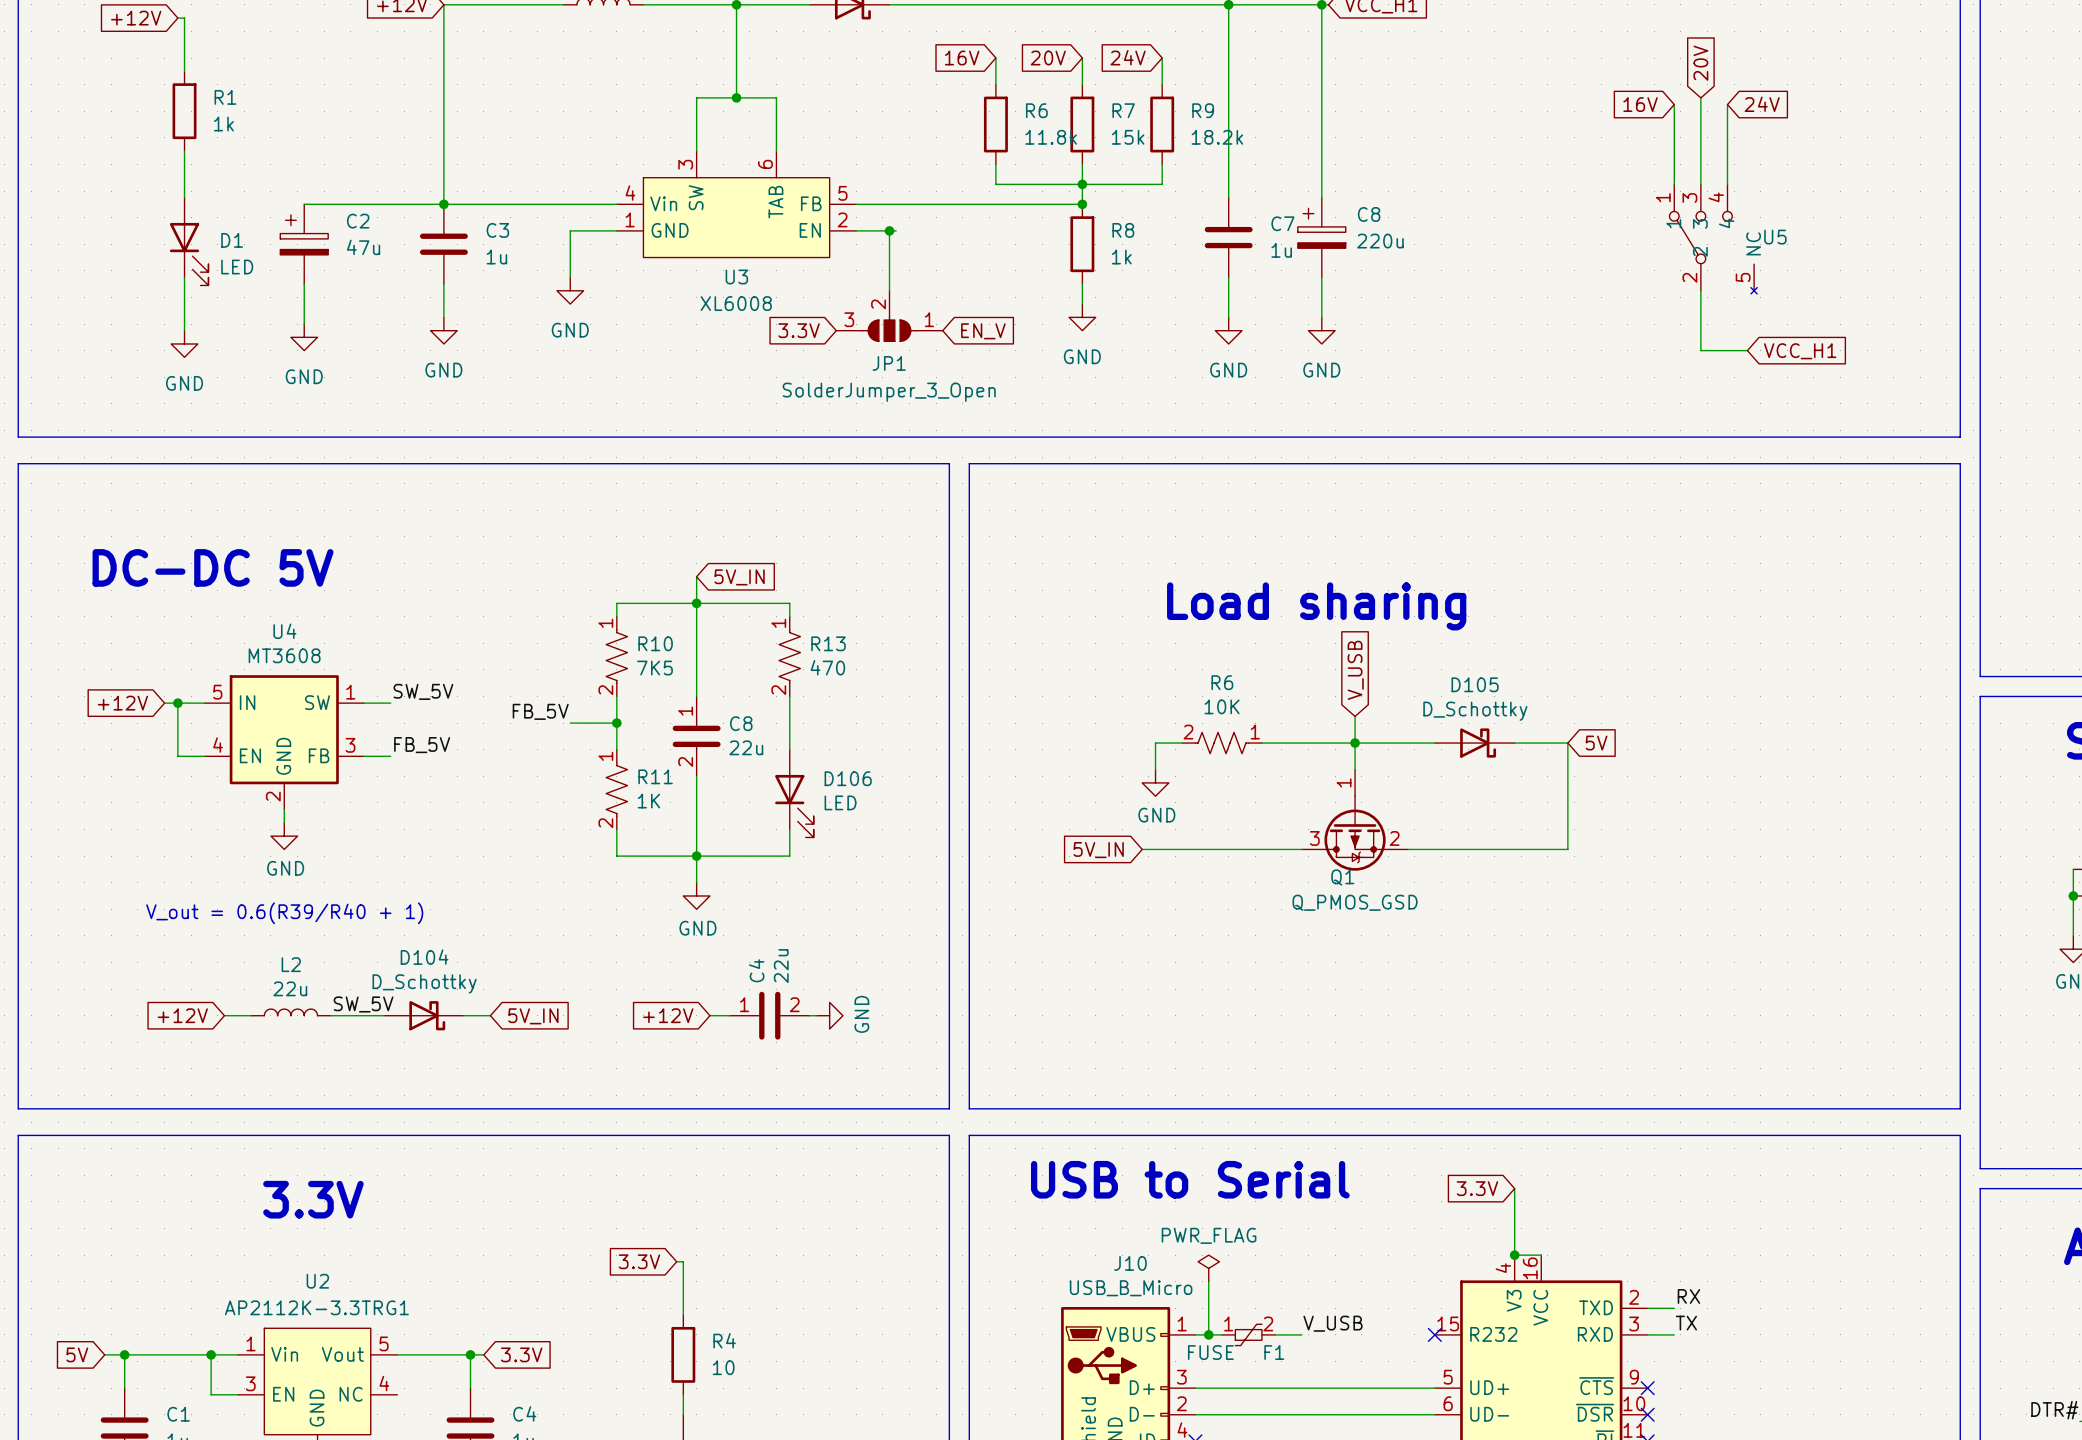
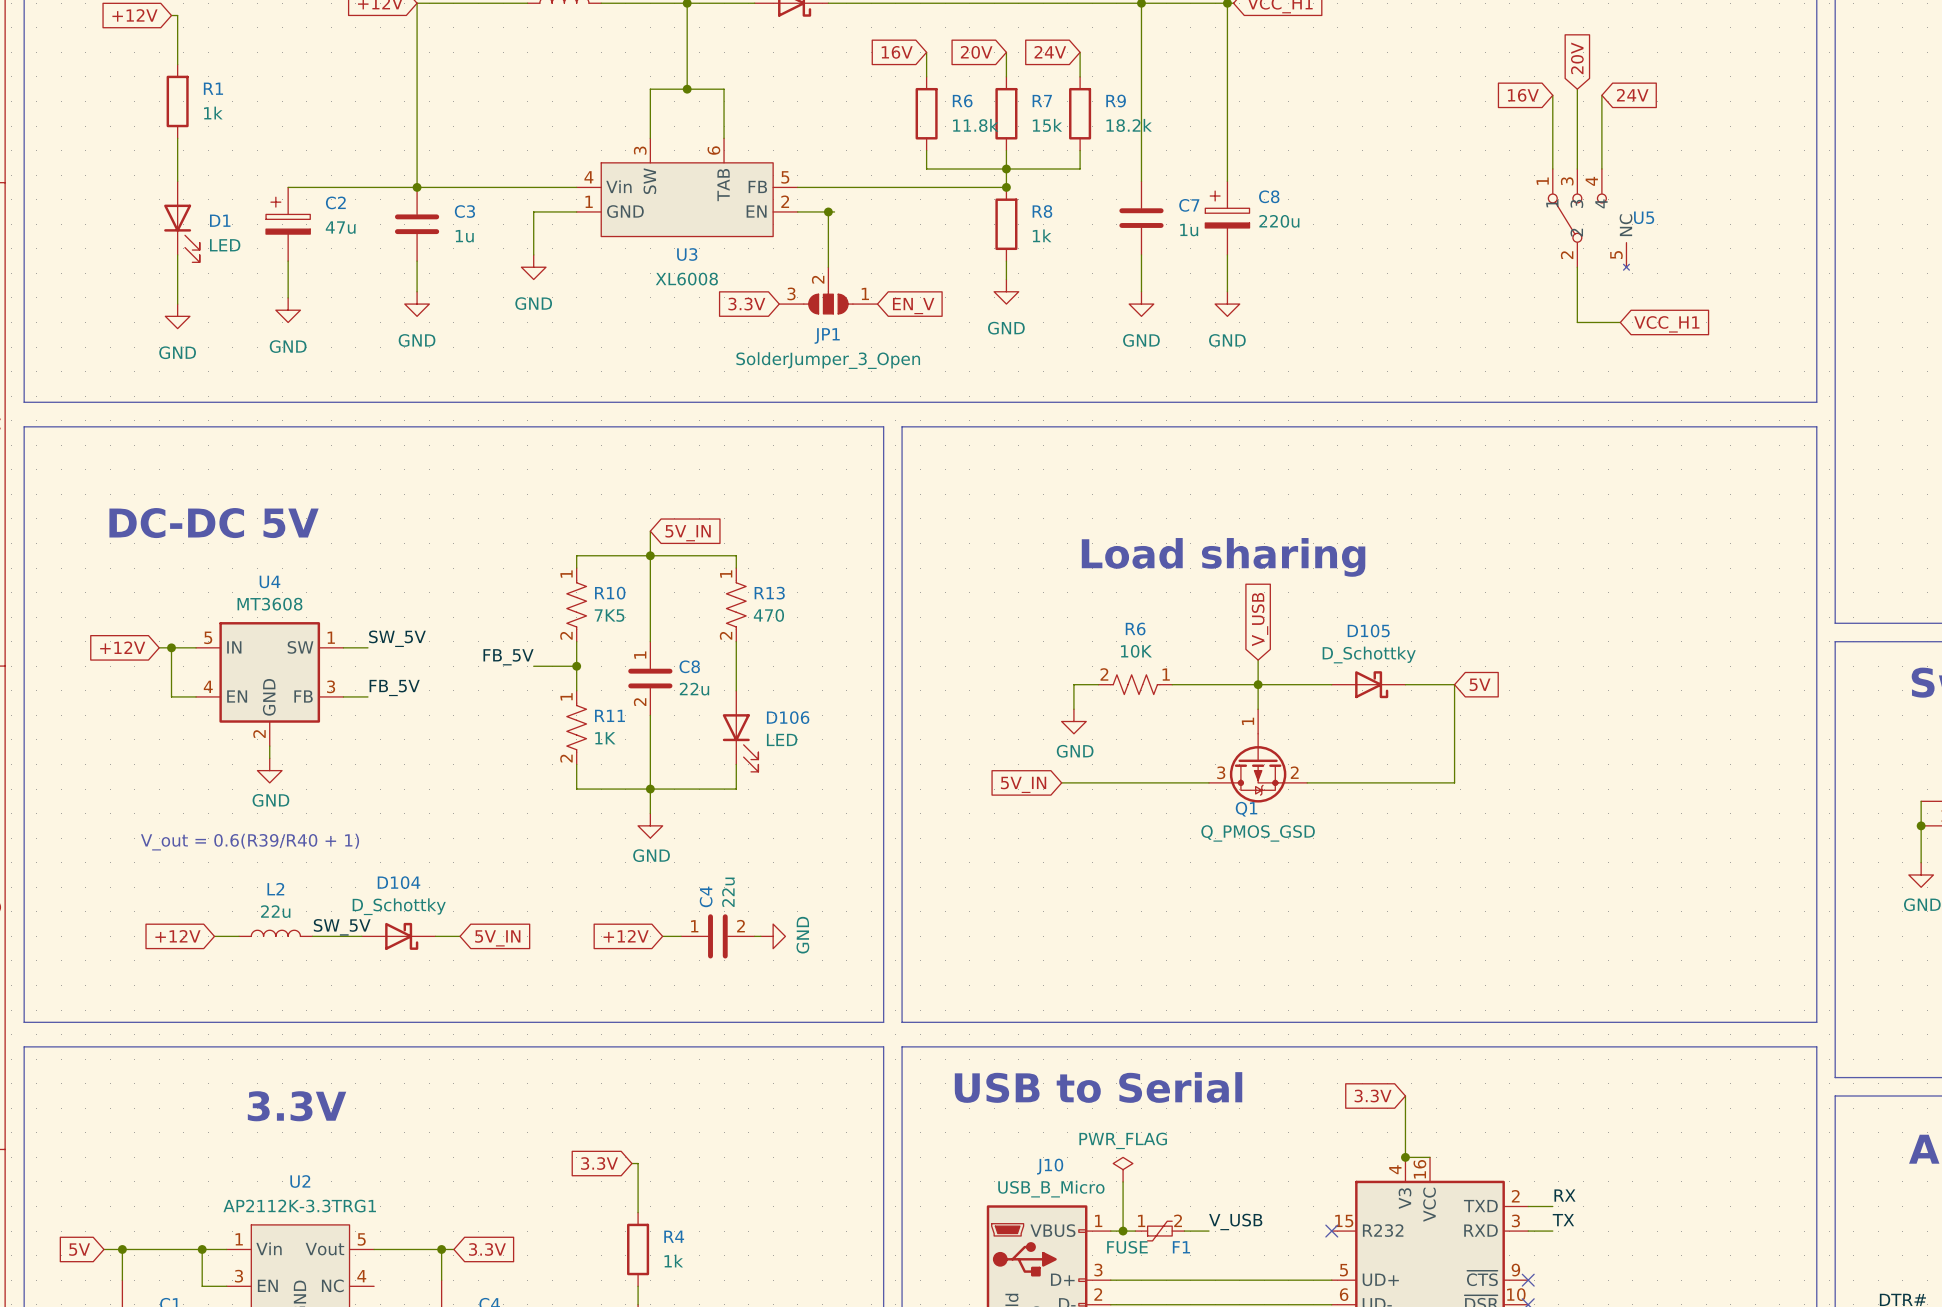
R4 value: 10 (723, 1367) -> 1k (673, 1261)

